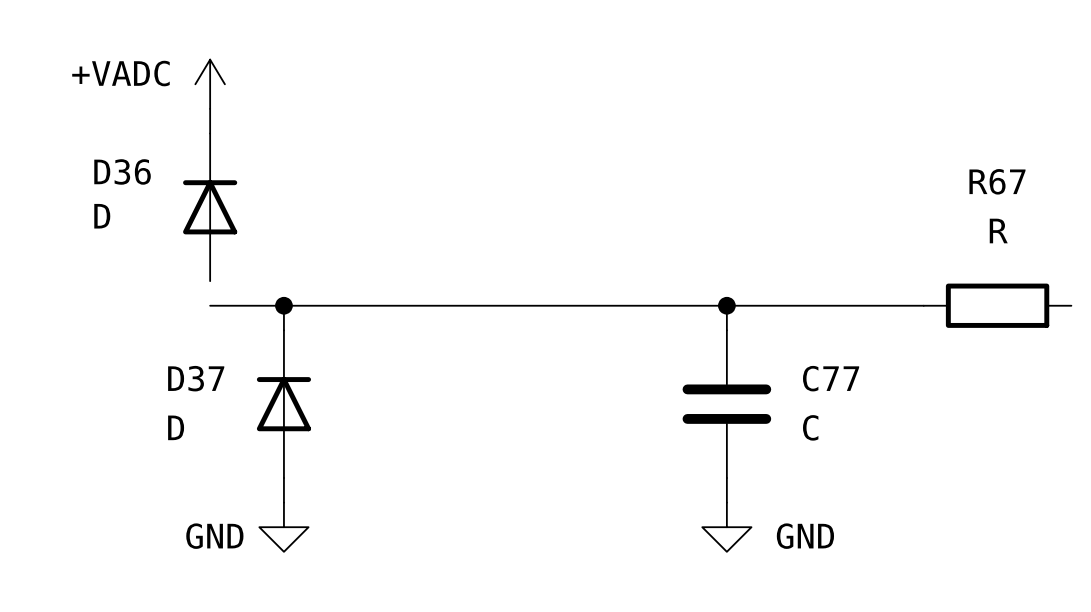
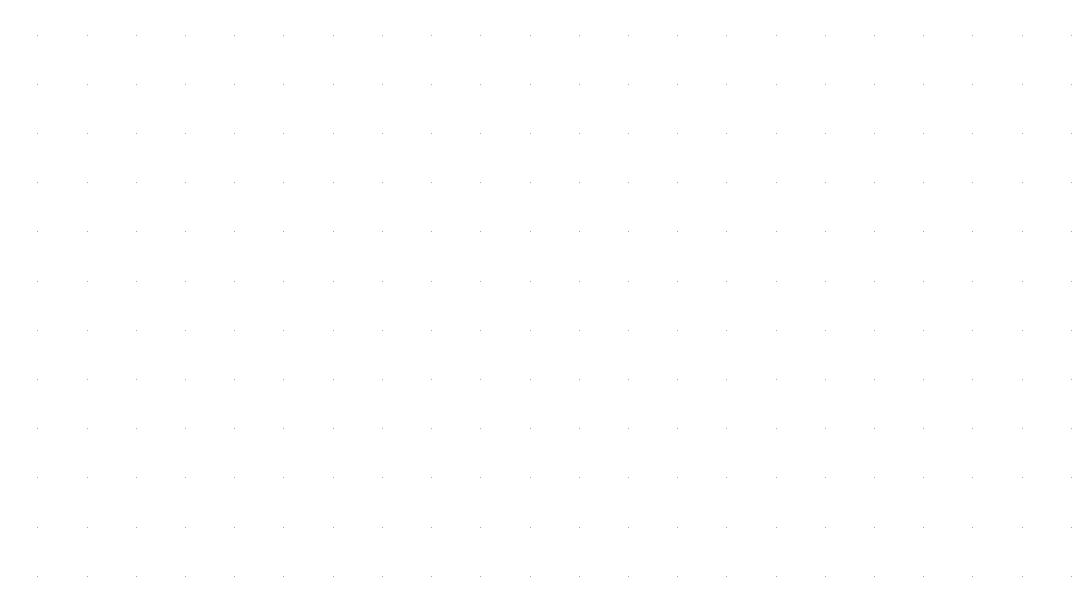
power symbol: +VADC (210, 84) -> none
wire: (210, 108) (210, 133) -> none
D36: D (210, 207) -> none
wire: (210, 305) (923, 305) -> none
wire: (283, 305) (283, 330) -> none
junction: (283, 305) -> none
wire: (726, 305) (726, 330) -> none
junction: (726, 305) -> none
R67: R (997, 305) -> none
D37: D (283, 404) -> none
C77: C (726, 404) -> none
wire: (283, 477) (283, 502) -> none
wire: (726, 477) (726, 502) -> none
power symbol: GND (283, 527) -> none
power symbol: GND (726, 527) -> none

